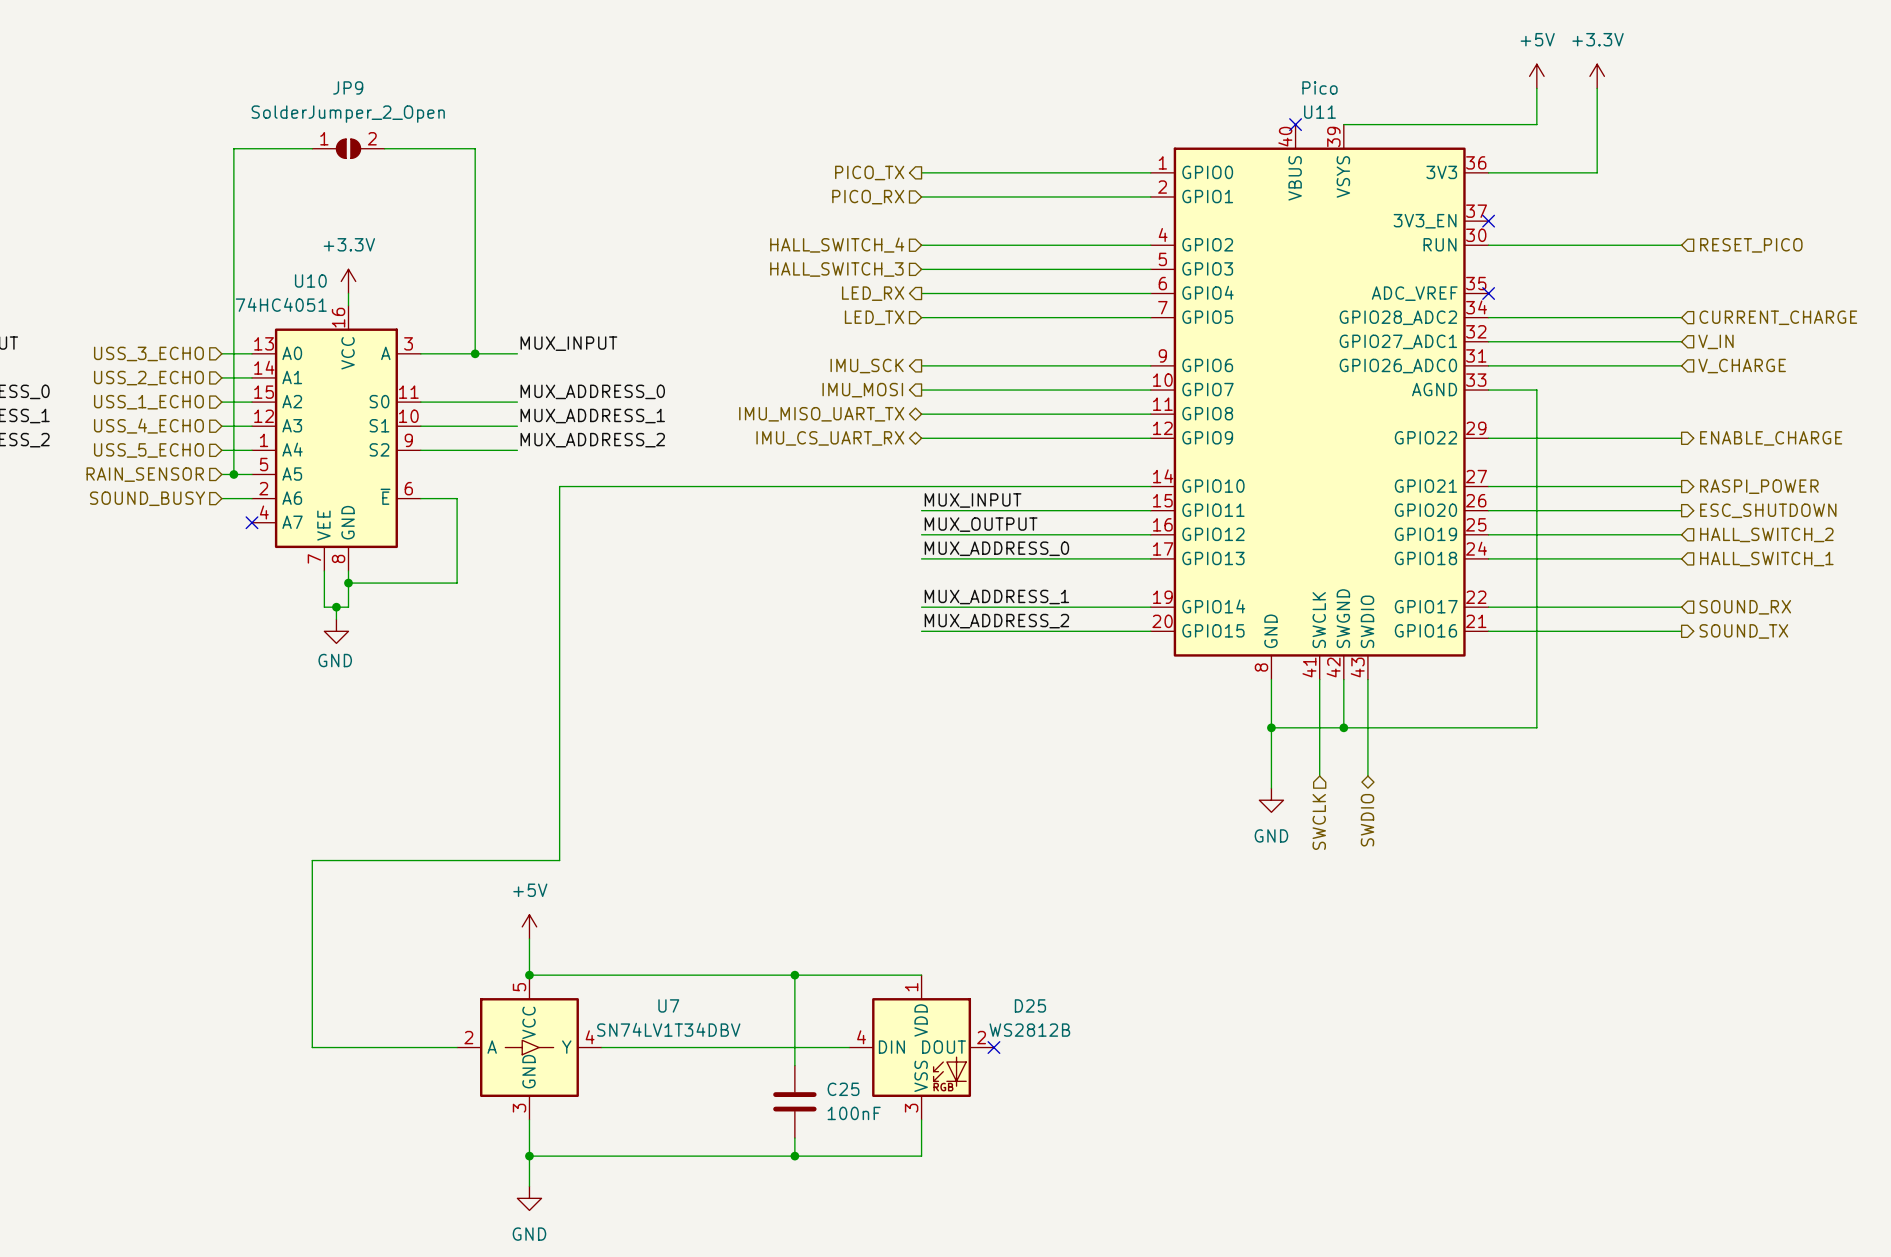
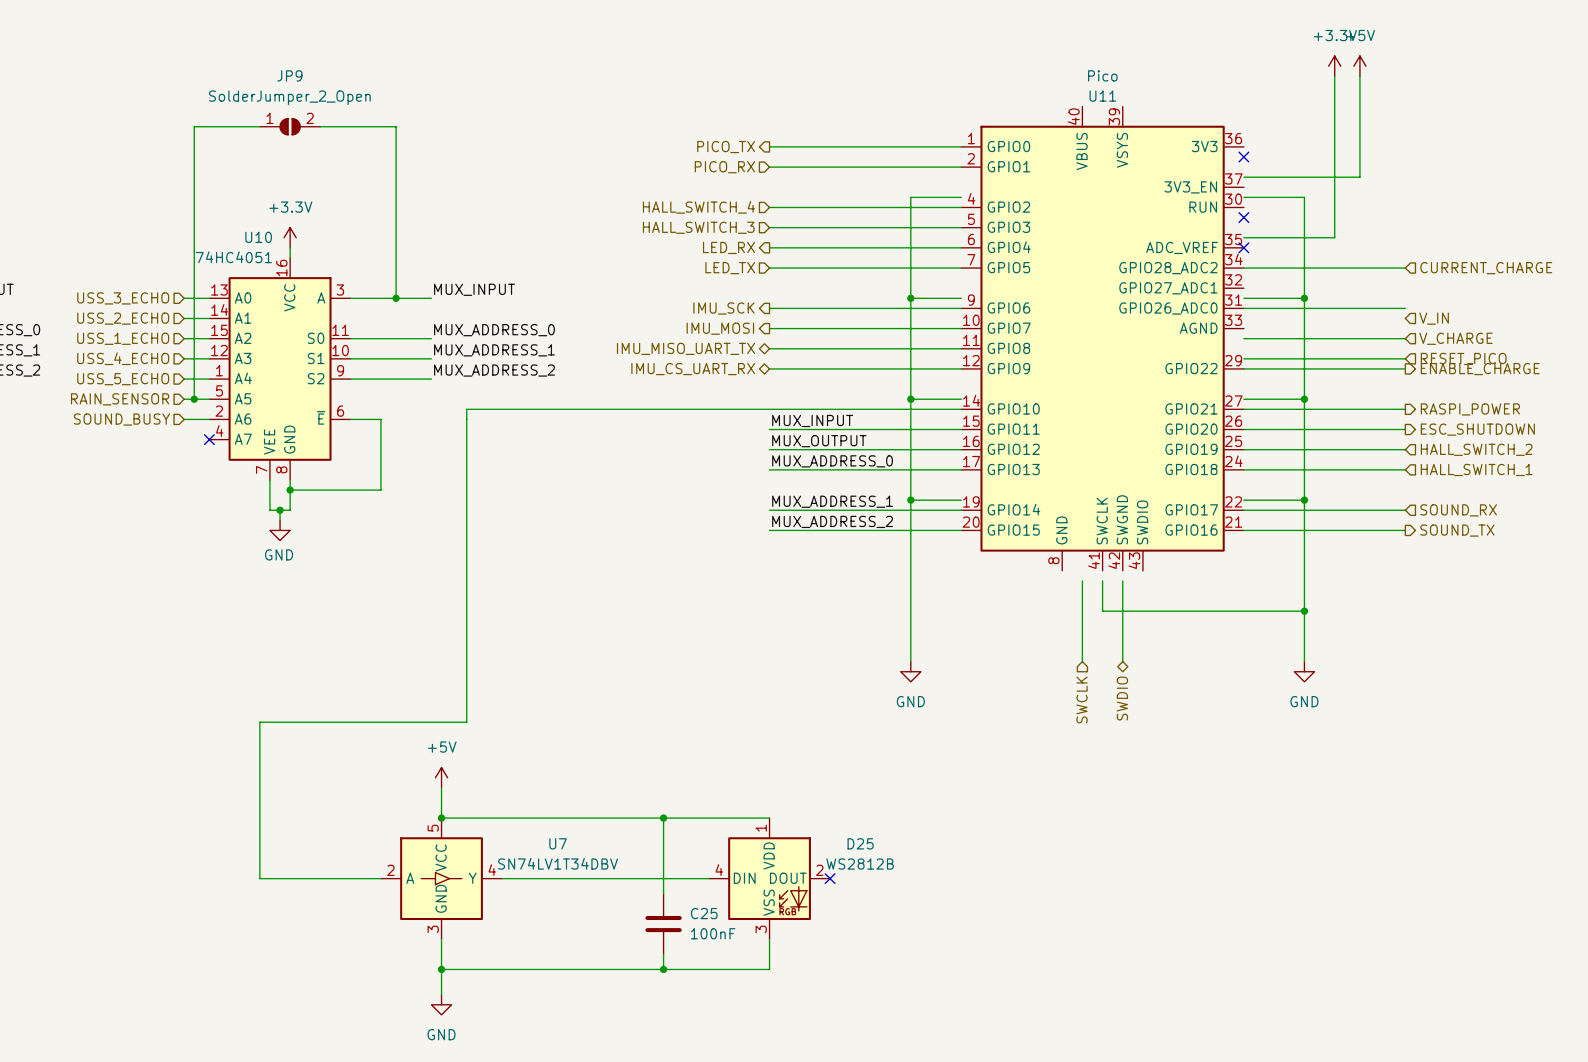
power symbol position: +5V (1536, 76) -> +5V (1359, 66)
wire: (1536, 88) (1536, 124) (1343, 124) -> none
wire: none -> (1359, 76) (1359, 177) (1243, 177)
no-connect mark: (1295, 124) -> none
wire: (1488, 172) (1597, 172) -> (1243, 237) (1334, 237) (1334, 146)
no-connect mark: none -> (1243, 157)
no-connect mark: (1488, 221) -> none
wire: none -> (961, 197) (910, 197) (910, 661)
wire: none -> (1243, 197) (1304, 197) (1304, 661)
wire: (1488, 245) (1681, 245) -> (1243, 358) (1405, 358)
hierarchical label position: RESET_PICO (1751, 245) -> RESET_PICO (1463, 358)
no-connect mark: none -> (1243, 217)
wire: (1488, 341) (1681, 341) -> (1243, 338) (1405, 338)
hierarchical label position: V_IN (1715, 341) -> V_IN (1434, 318)
wire: none -> (910, 298) (961, 298)
junction: none -> (910, 298)
wire: none -> (1243, 298) (1304, 298)
junction: none -> (1304, 298)
hierarchical label position: V_CHARGE (1742, 366) -> V_CHARGE (1455, 338)
wire: (1488, 390) (1536, 390) (1536, 727) -> (1304, 611) (1284, 611)
wire: none -> (910, 399) (961, 399)
junction: none -> (910, 399)
wire: none -> (1243, 399) (1304, 399)
junction: none -> (1304, 399)
wire: none -> (910, 500) (961, 500)
junction: none -> (910, 500)
wire: none -> (1243, 500) (1304, 500)
junction: none -> (1304, 500)
wire: (1271, 679) (1271, 788) -> none
wire: (1319, 679) (1319, 691) -> none
wire: (1343, 679) (1343, 691) -> none
wire: (1367, 679) (1367, 776) -> (1082, 580) (1082, 661)
wire: (1271, 727) (1319, 727) (1319, 776) -> none
junction: (1271, 727) -> none
wire: none -> (1122, 611) (1122, 661)
junction: (1343, 727) -> none
junction: none -> (1304, 611)
power symbol: none -> GND (910, 671)
power symbol: GND (1271, 800) -> none
power symbol: none -> GND (1304, 671)
hierarchical label position: SWDIO (1367, 820) -> SWDIO (1122, 698)
hierarchical label position: SWCLK (1319, 821) -> SWCLK (1082, 700)

